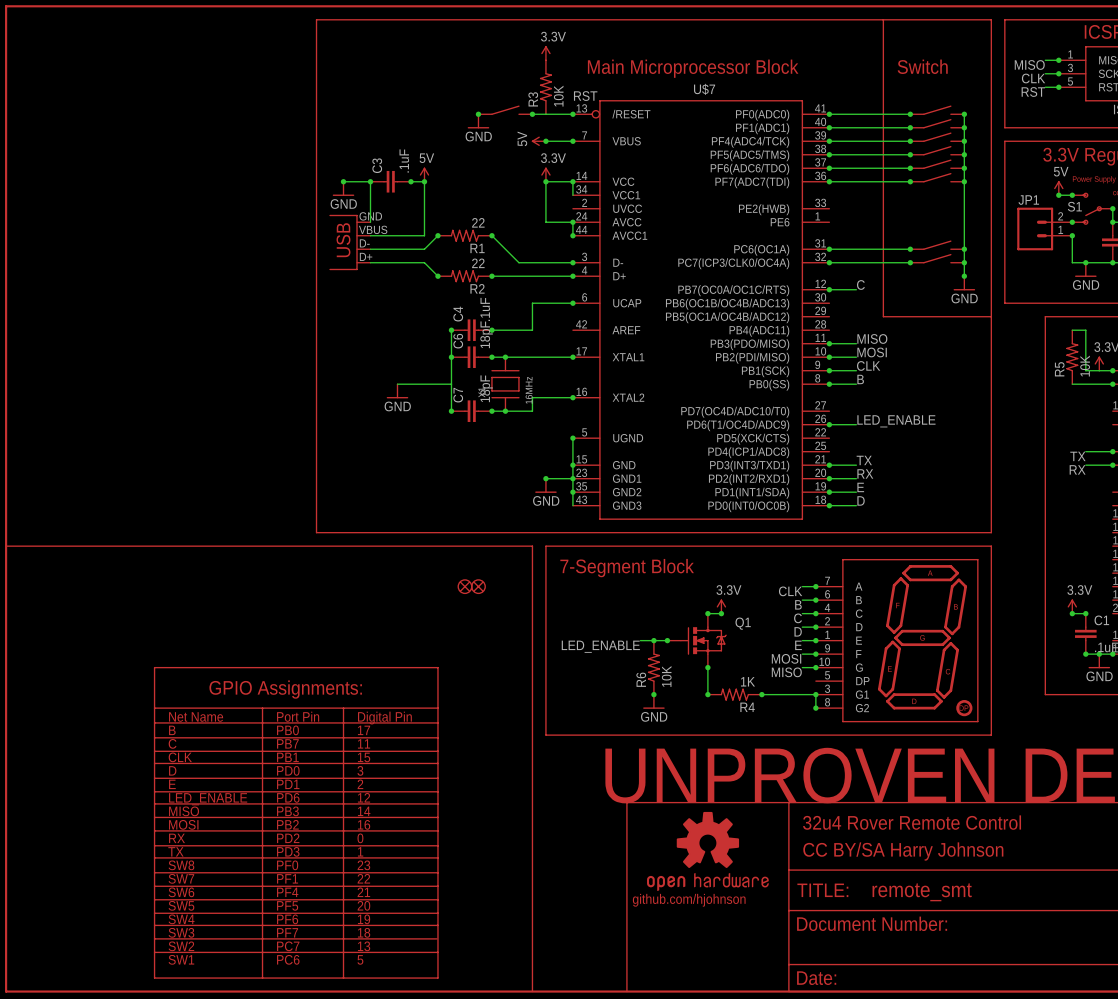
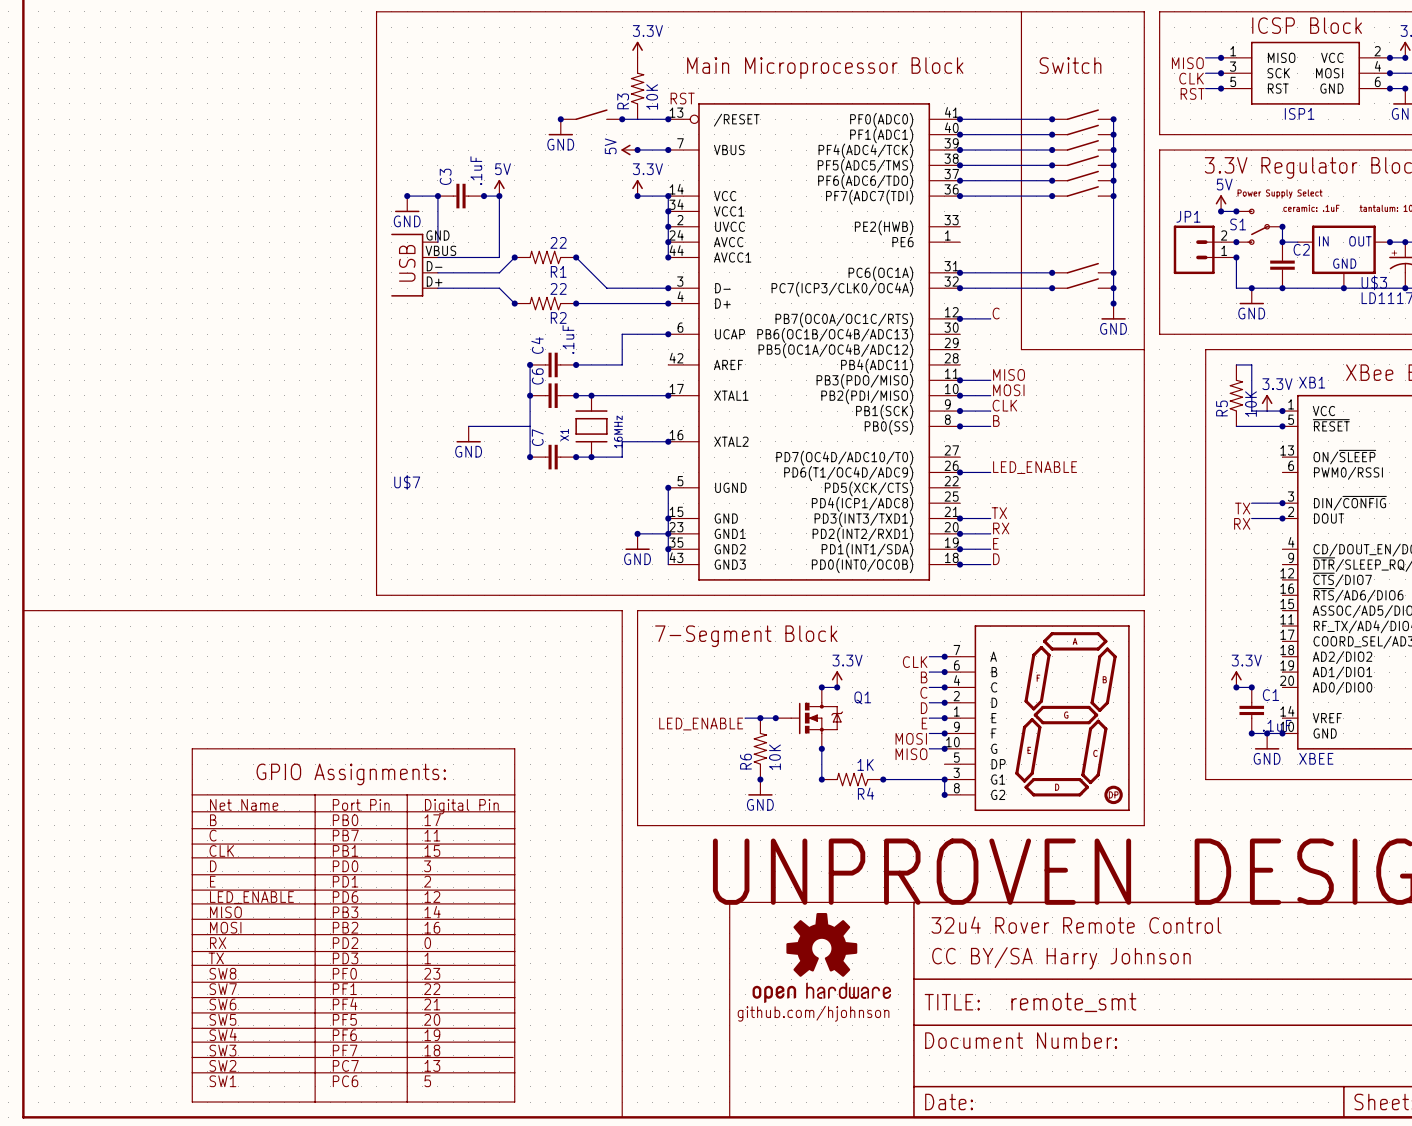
U$7 name position: U$7 (704, 89) -> U$7 (407, 482)
wire: (545, 181) (545, 222) (572, 222) -> (668, 211) (668, 242)
junction: none -> (668, 211)
junction: none -> (668, 226)
C6 value: 18pF (486, 334) -> none
C7 value: 18pF (486, 388) -> none
part: (464, 586) -> none
part: (478, 586) -> none

